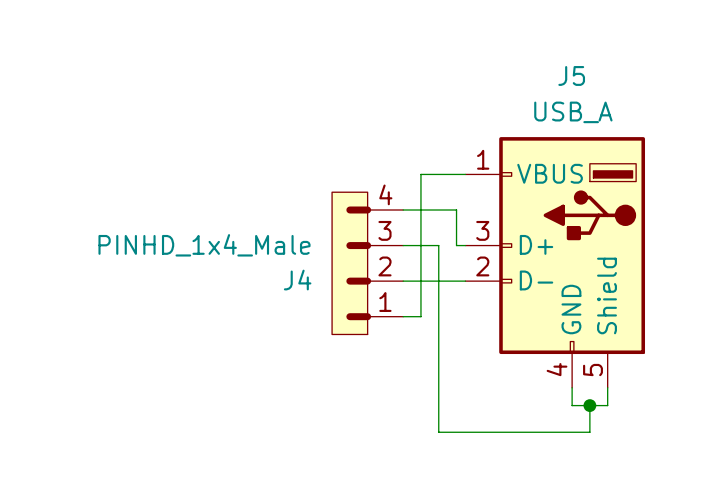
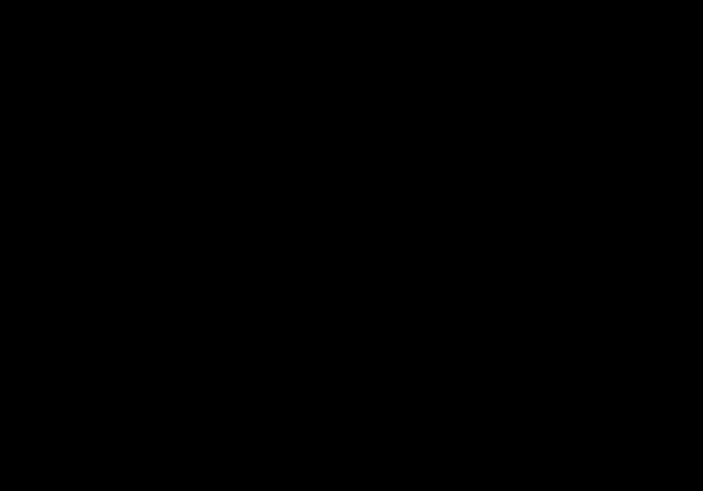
wire: (465, 174) (420, 174) (420, 316) (403, 316) -> none
wire: (403, 210) (456, 210) (456, 245) (465, 245) -> none
wire: (403, 245) (438, 245) (438, 432) (589, 432) (589, 405) -> none
J5: USB_A (555, 262) -> none
J4: PINHD_1x4_Male (367, 263) -> none
wire: (403, 281) (465, 281) -> none
wire: (572, 387) (572, 405) (607, 405) (607, 387) -> none
junction: (589, 405) -> none

